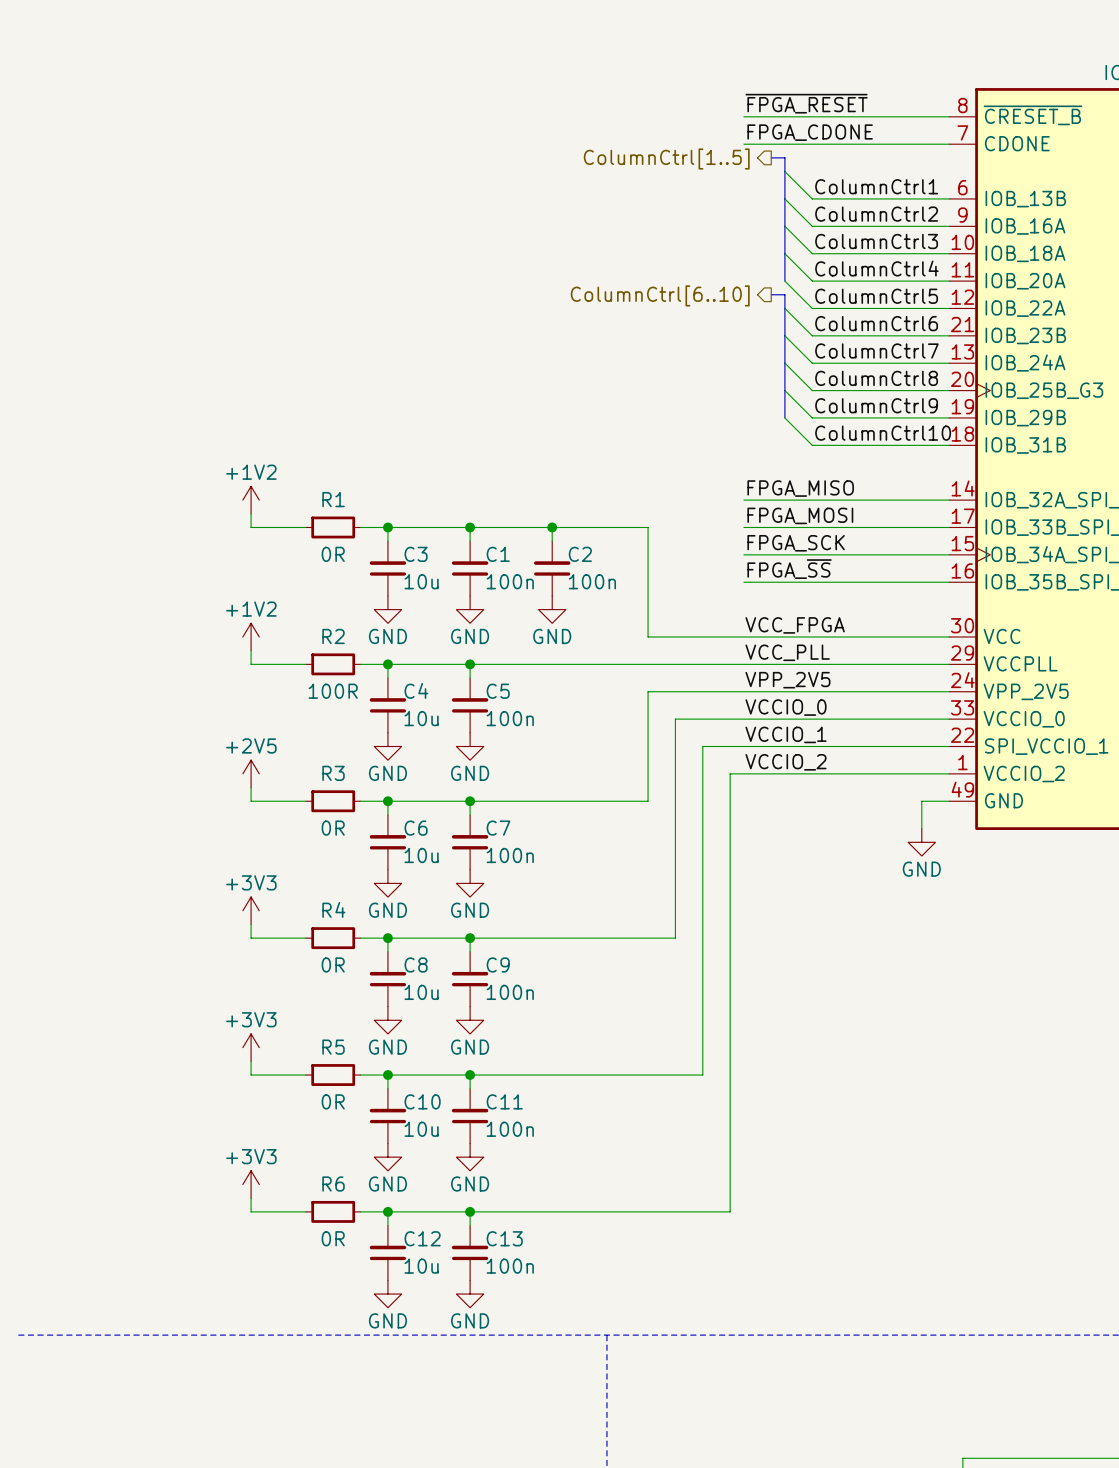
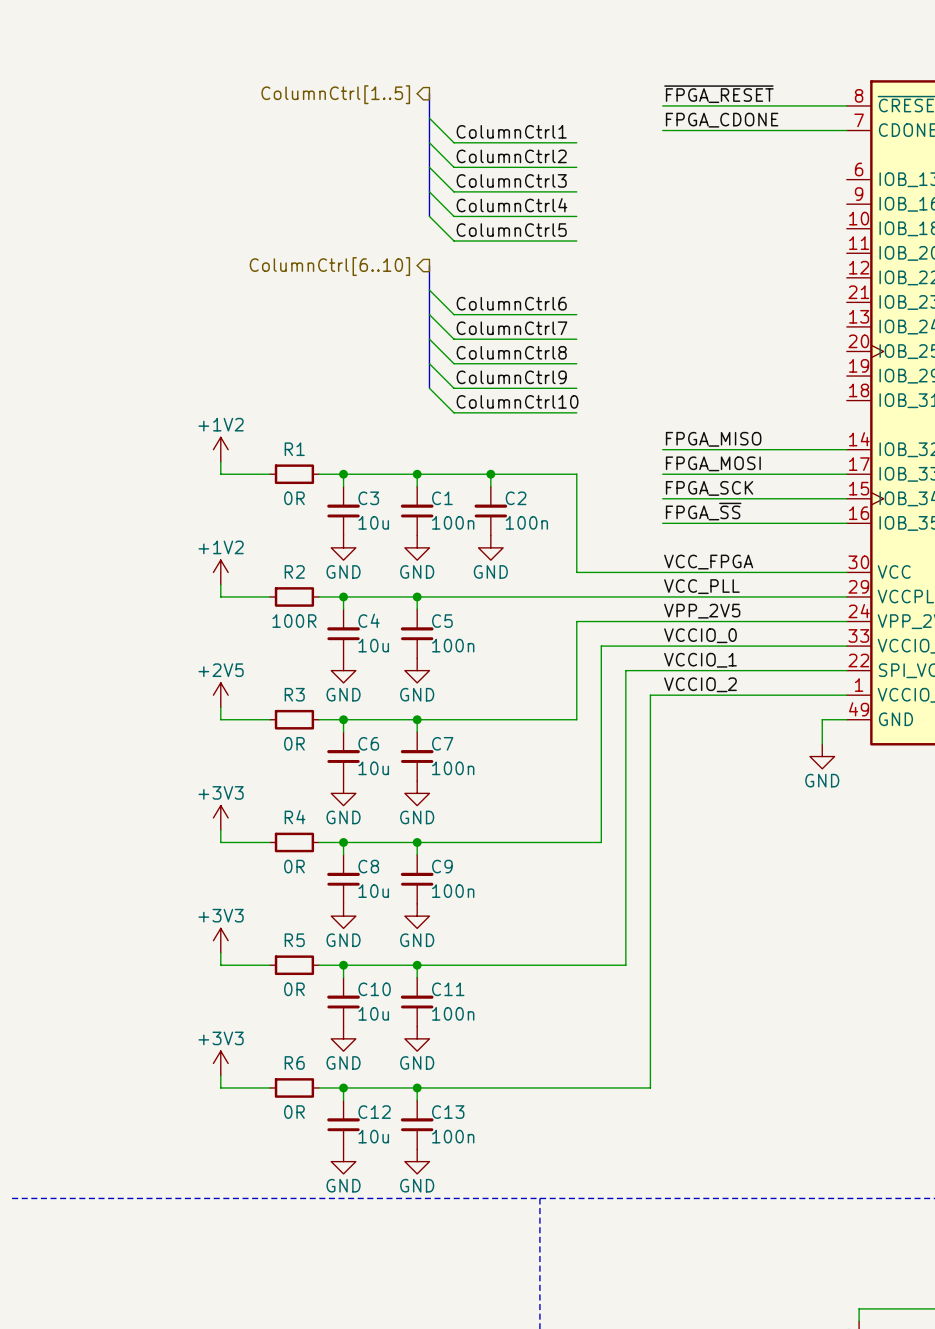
bus: none -> (429, 93) (429, 216)
hierarchical label: none -> ColumnCtrl[1..5] (335, 94)
wire: none -> (429, 118) (454, 142) (576, 142)
label: none -> ColumnCtrl1 (511, 131)
wire: none -> (429, 142) (454, 167) (576, 167)
bus: (771, 157) (784, 157) (784, 281) -> none
hierarchical label: ColumnCtrl[1..5] (666, 159) -> none
wire: (784, 171) (812, 198) (949, 198) -> none
label: none -> ColumnCtrl2 (511, 156)
wire: none -> (429, 167) (454, 191) (576, 191)
label: ColumnCtrl1 (876, 186) -> none
wire: (784, 198) (812, 226) (949, 226) -> none
label: none -> ColumnCtrl3 (511, 180)
wire: none -> (429, 191) (454, 216) (576, 216)
label: ColumnCtrl2 (876, 214) -> none
wire: (784, 226) (812, 253) (949, 253) -> none
label: none -> ColumnCtrl4 (511, 205)
wire: none -> (429, 216) (454, 241) (576, 241)
label: ColumnCtrl3 (876, 241) -> none
wire: (784, 253) (812, 281) (949, 281) -> none
label: none -> ColumnCtrl5 (511, 230)
label: ColumnCtrl4 (876, 268) -> none
wire: (784, 281) (812, 308) (949, 308) -> none
bus: none -> (429, 265) (429, 388)
bus: (771, 294) (784, 294) (784, 417) -> none
hierarchical label: none -> ColumnCtrl[6..10] (329, 266)
hierarchical label: ColumnCtrl[6..10] (660, 295) -> none
label: ColumnCtrl5 (876, 296) -> none
wire: (784, 308) (812, 335) (949, 335) -> none
wire: none -> (429, 290) (454, 314) (576, 314)
label: ColumnCtrl6 (876, 323) -> none
wire: (784, 335) (812, 363) (949, 363) -> none
label: none -> ColumnCtrl6 (511, 303)
wire: none -> (429, 314) (454, 339) (576, 339)
label: ColumnCtrl7 (876, 351) -> none
wire: (784, 363) (812, 390) (949, 390) -> none
label: none -> ColumnCtrl7 (511, 328)
wire: none -> (429, 339) (454, 363) (576, 363)
label: ColumnCtrl8 (876, 378) -> none
wire: (784, 390) (812, 417) (949, 417) -> none
label: none -> ColumnCtrl8 (511, 352)
wire: none -> (429, 363) (454, 388) (576, 388)
label: ColumnCtrl9 (876, 405) -> none
wire: (784, 417) (812, 445) (949, 445) -> none
label: none -> ColumnCtrl9 (511, 377)
wire: none -> (429, 388) (454, 412) (576, 412)
label: ColumnCtrl10 (883, 433) -> none
label: none -> ColumnCtrl10 (517, 401)

